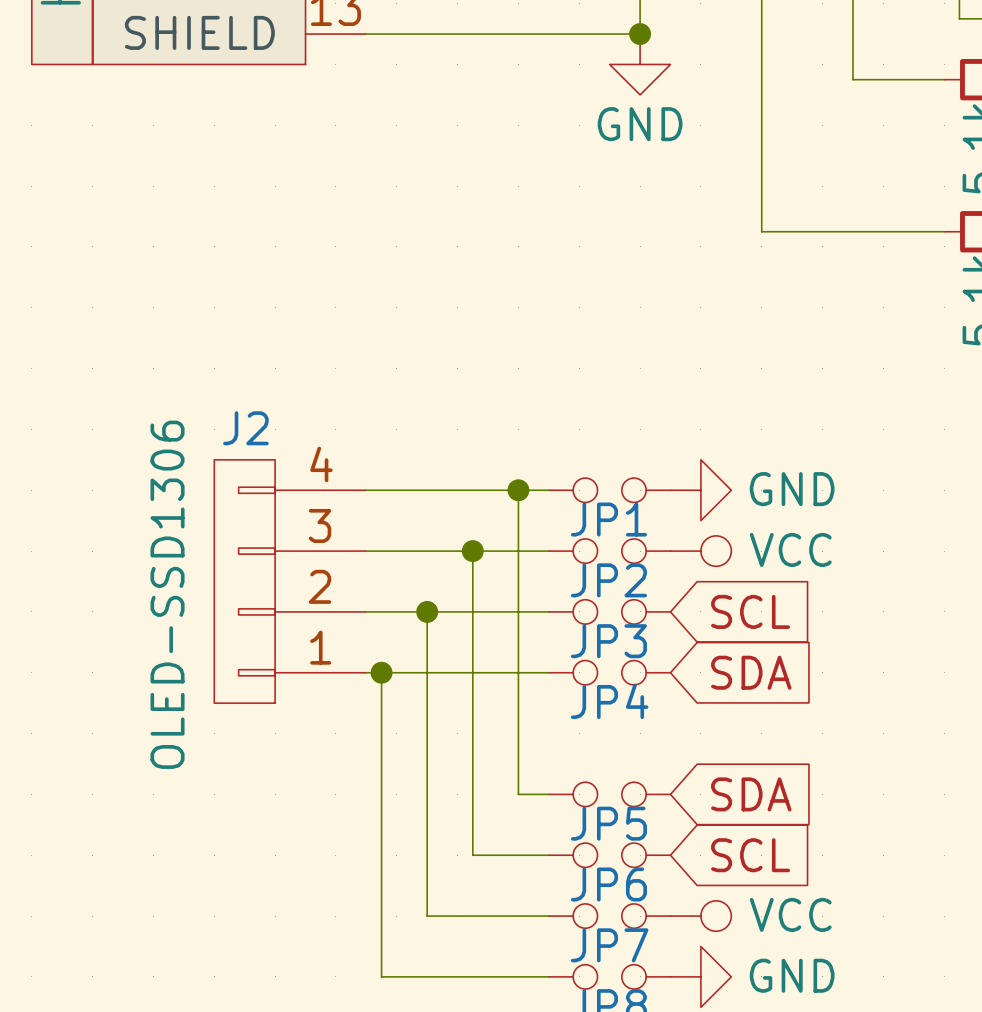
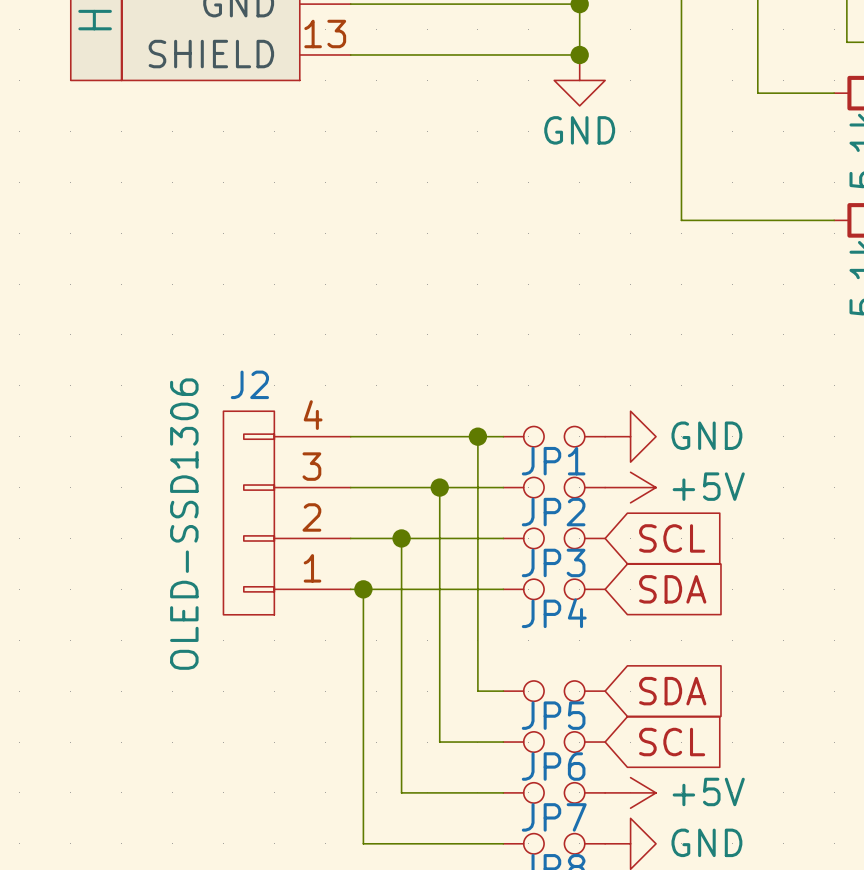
power symbol: VCC (700, 551) -> +5V (630, 487)
power symbol: VCC (700, 916) -> +5V (630, 792)

